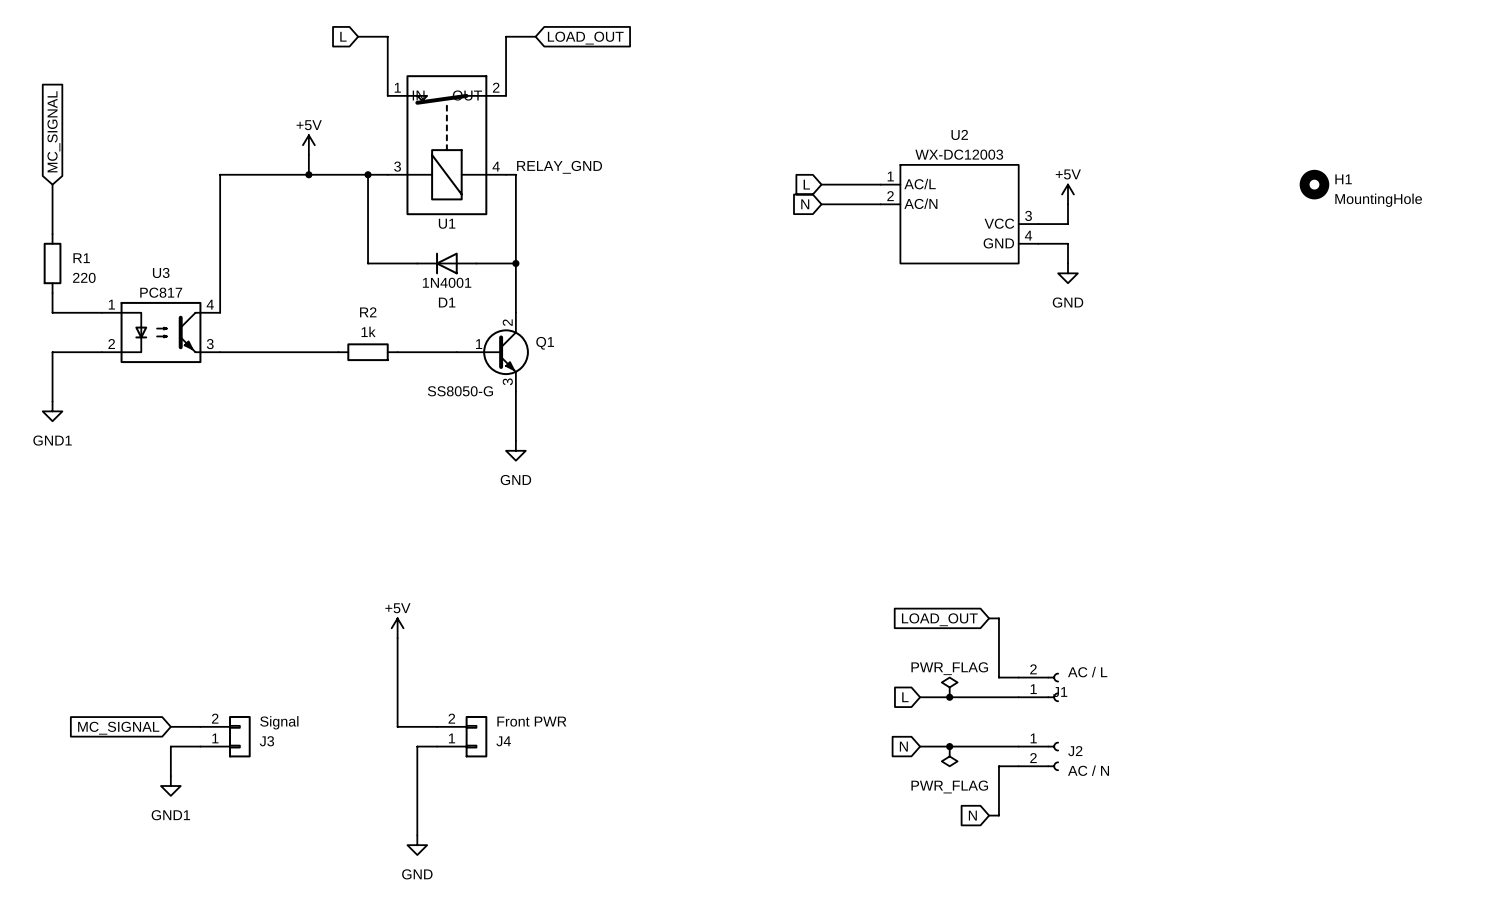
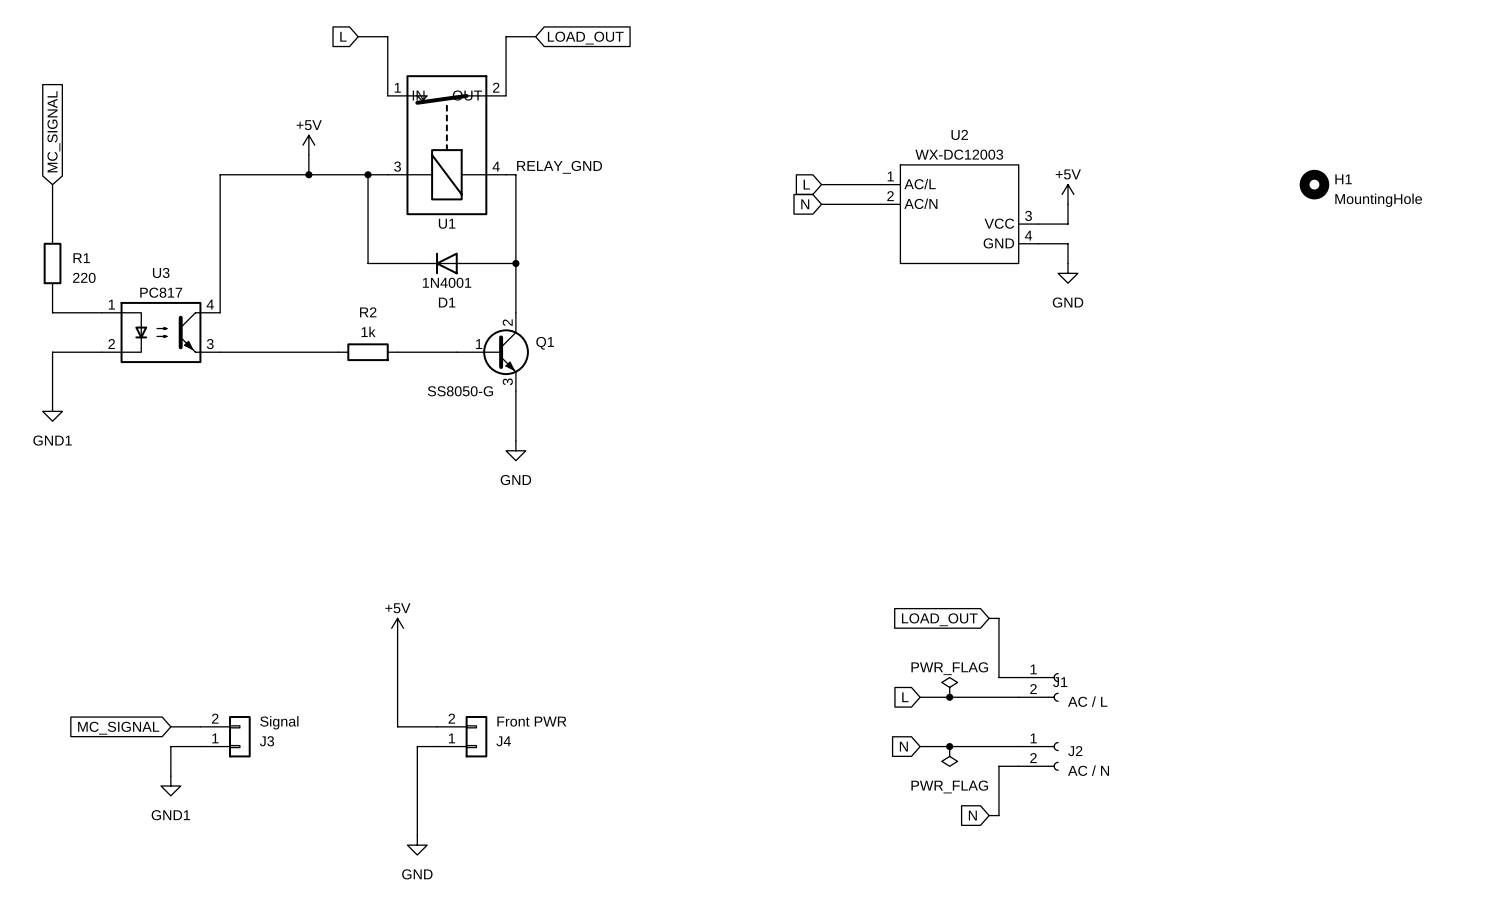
J1 flip: as is (1053, 687) -> up-down (1053, 687)

